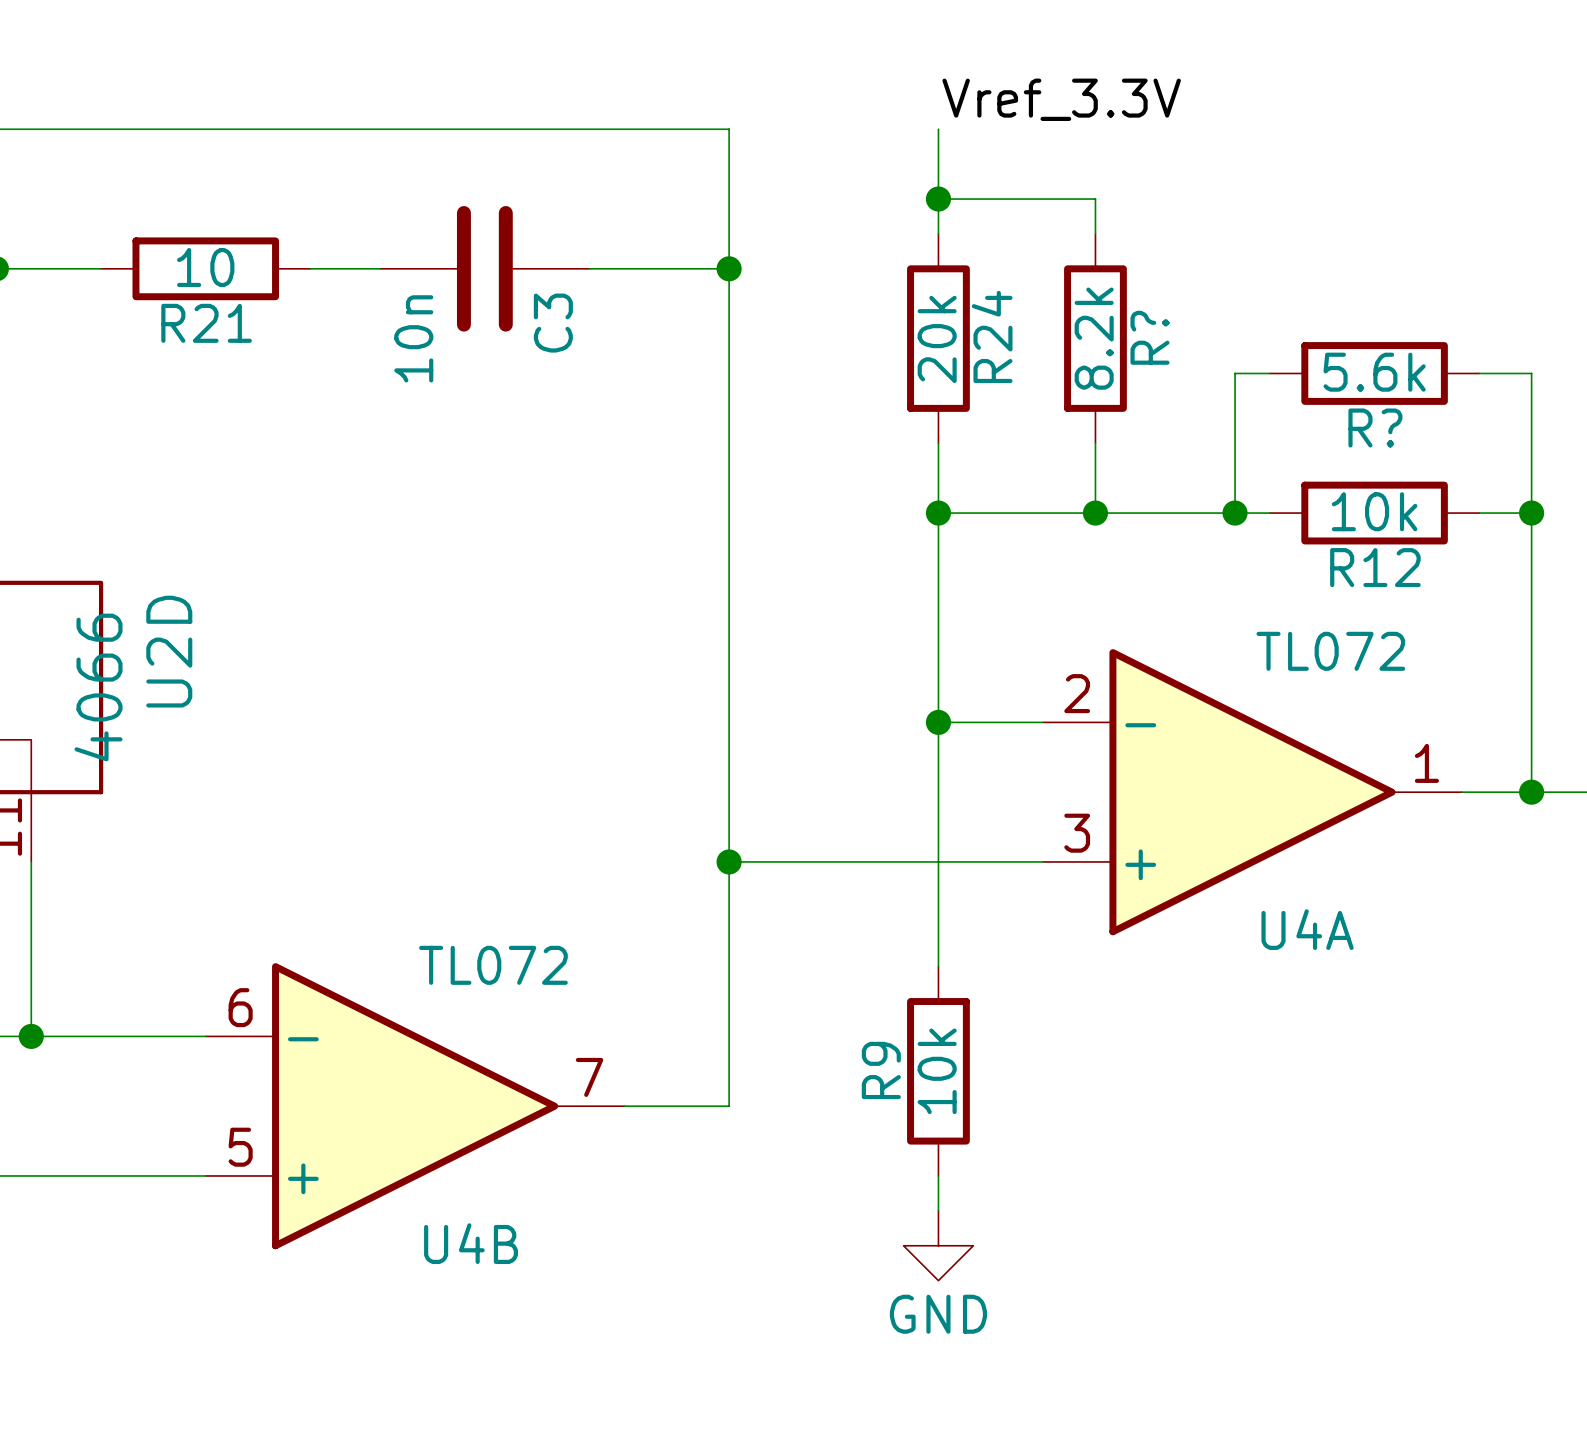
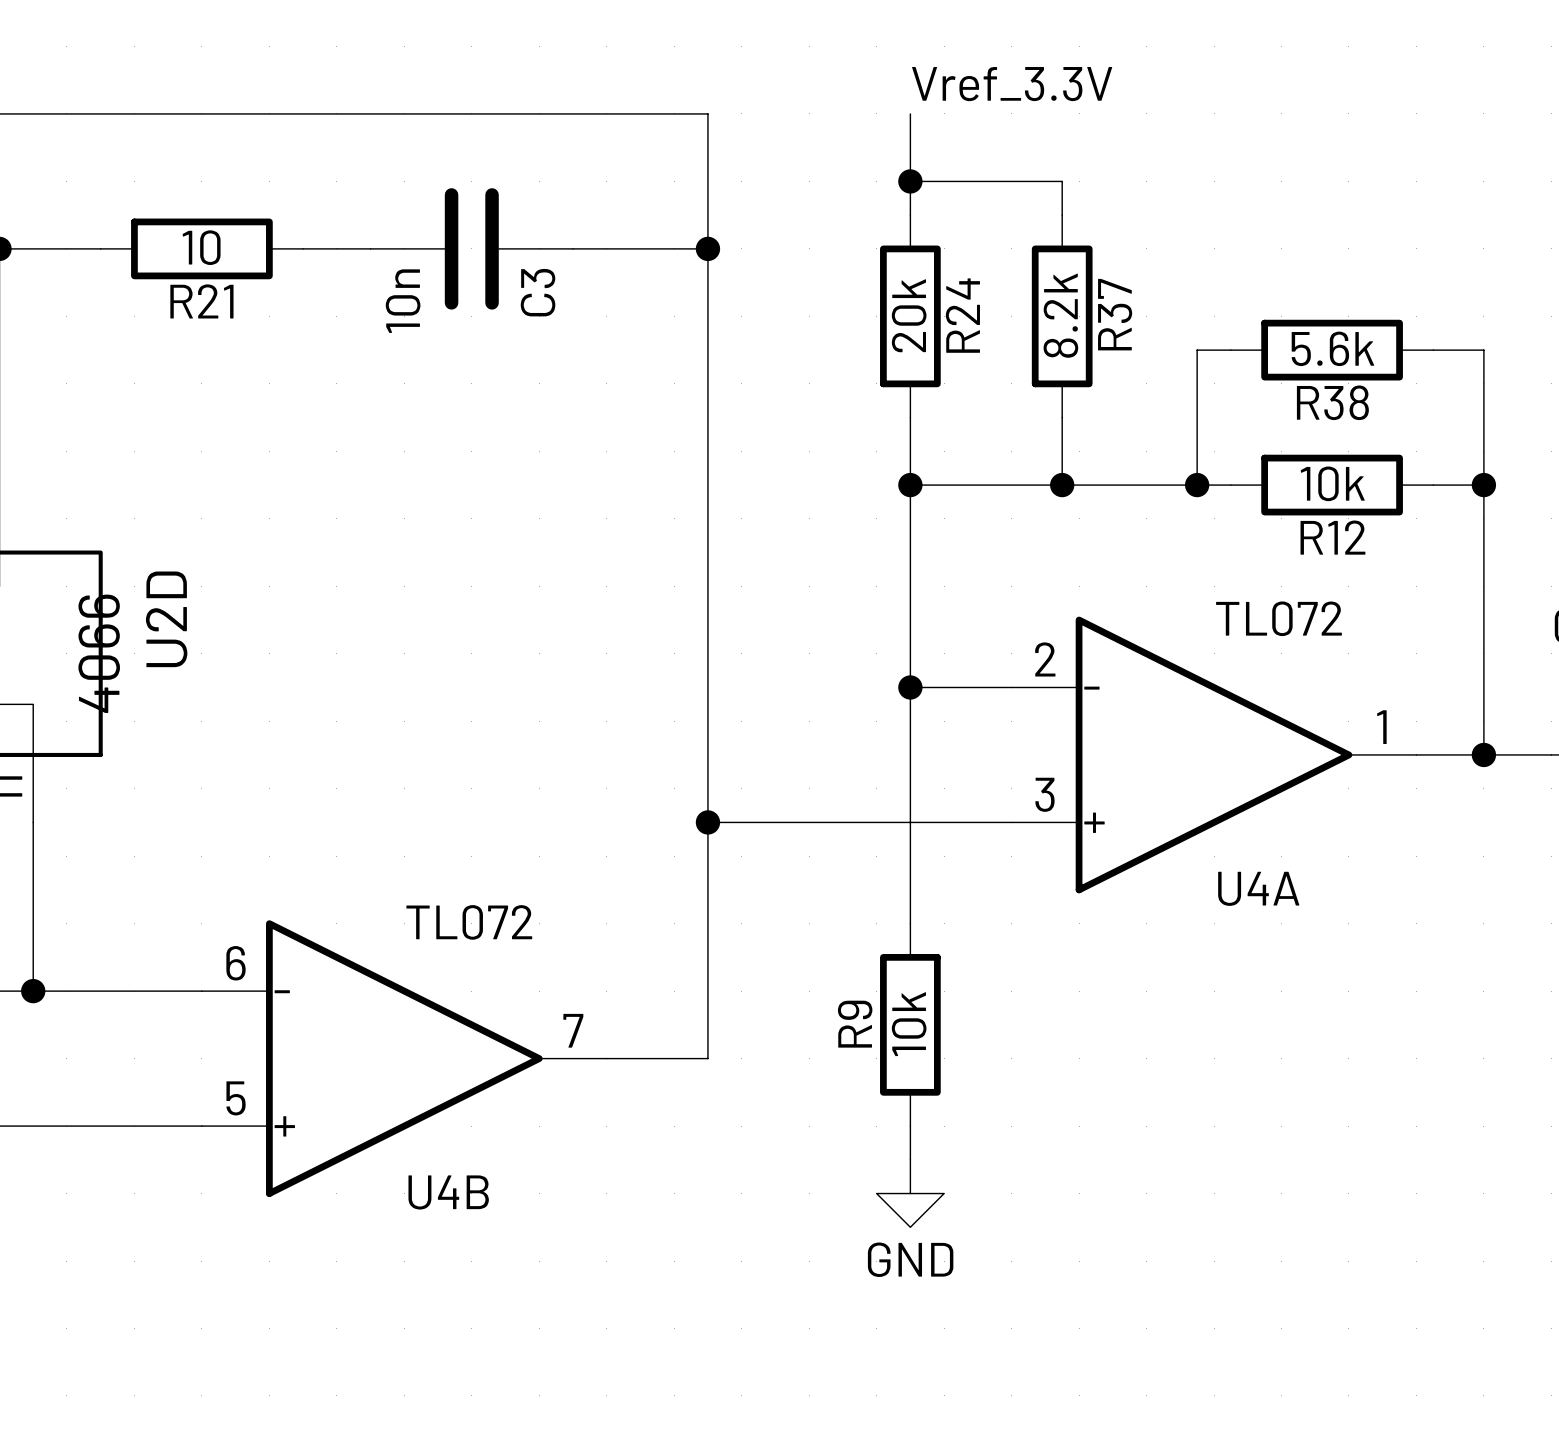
R? name: R? (1149, 337) -> R37 (1115, 314)
R? name: R? (1375, 428) -> R38 (1332, 402)

